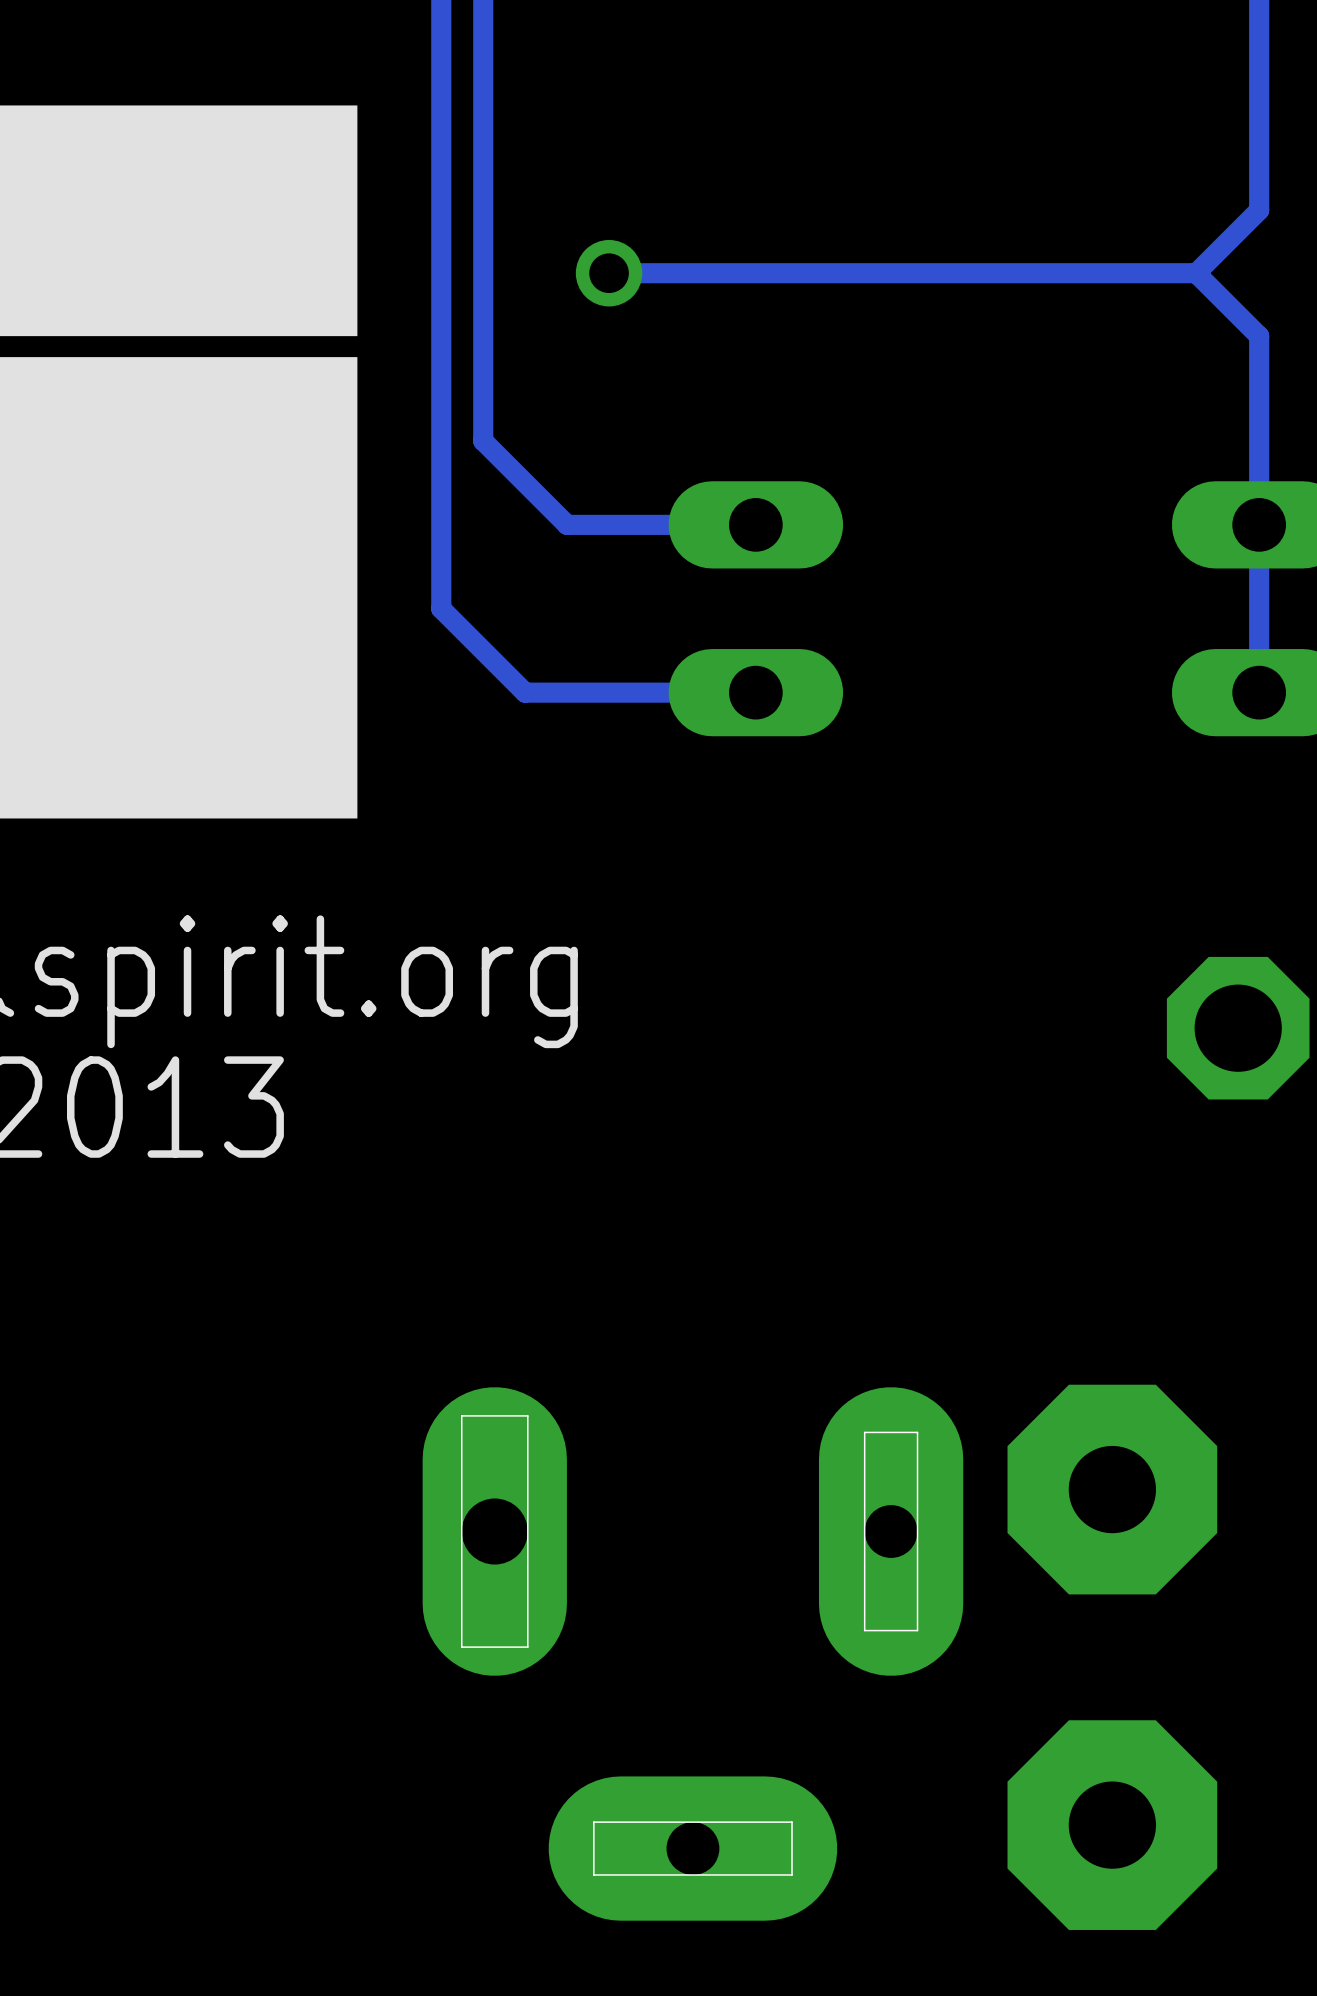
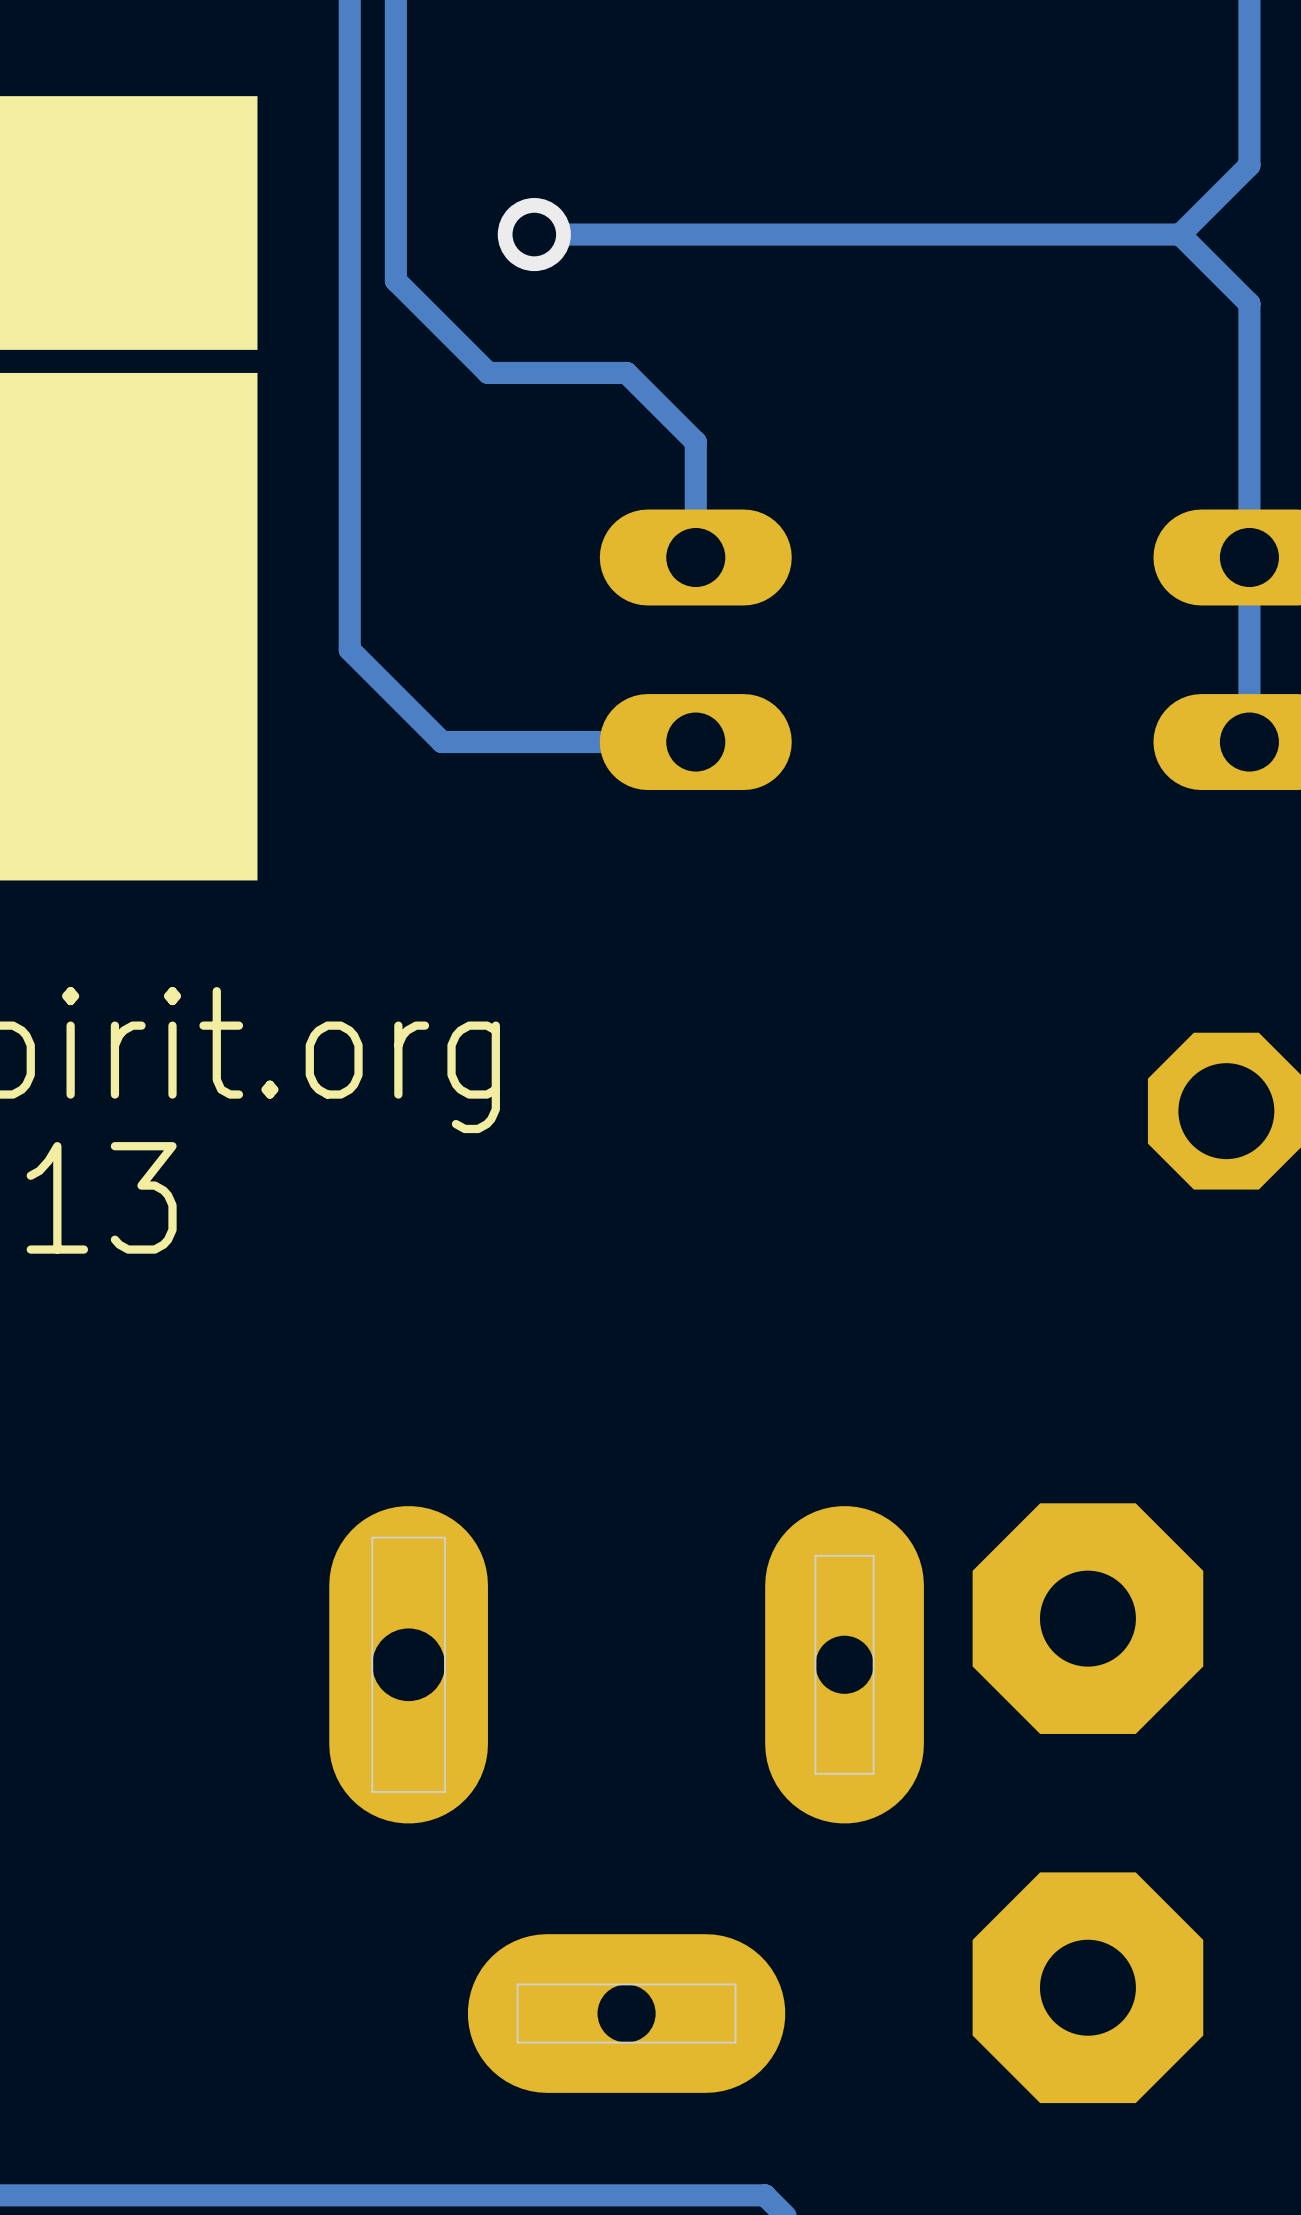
track: (1259, 168) (1259, 210) (1196, 273) -> (1249, 165) (1180, 234)
track: (483, 273) (483, 440) (567, 524) (755, 524) -> (395, 280) (488, 372) (626, 372) (695, 442) (695, 557)
via position: (609, 273) -> (534, 234)
track: (1196, 273) (1259, 336) -> (1180, 234) (1249, 303) (1249, 349)
track: (1196, 273) (609, 273) -> (1180, 234) (534, 234)

